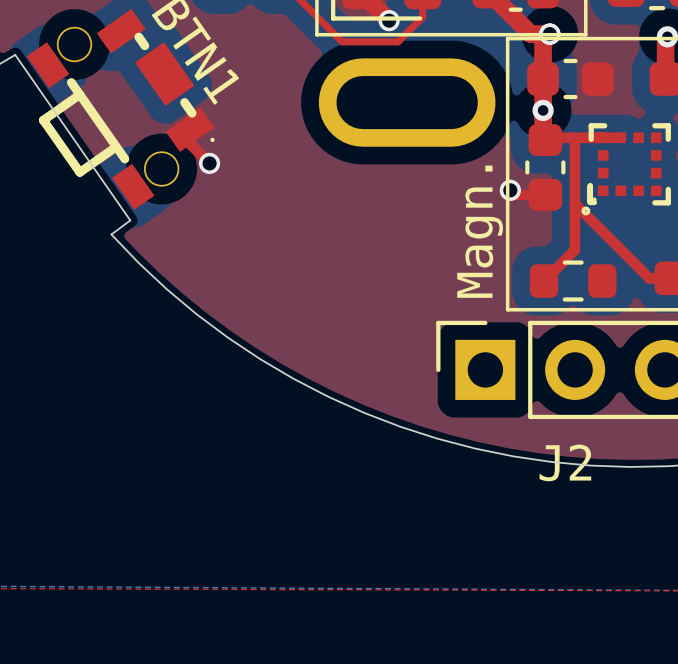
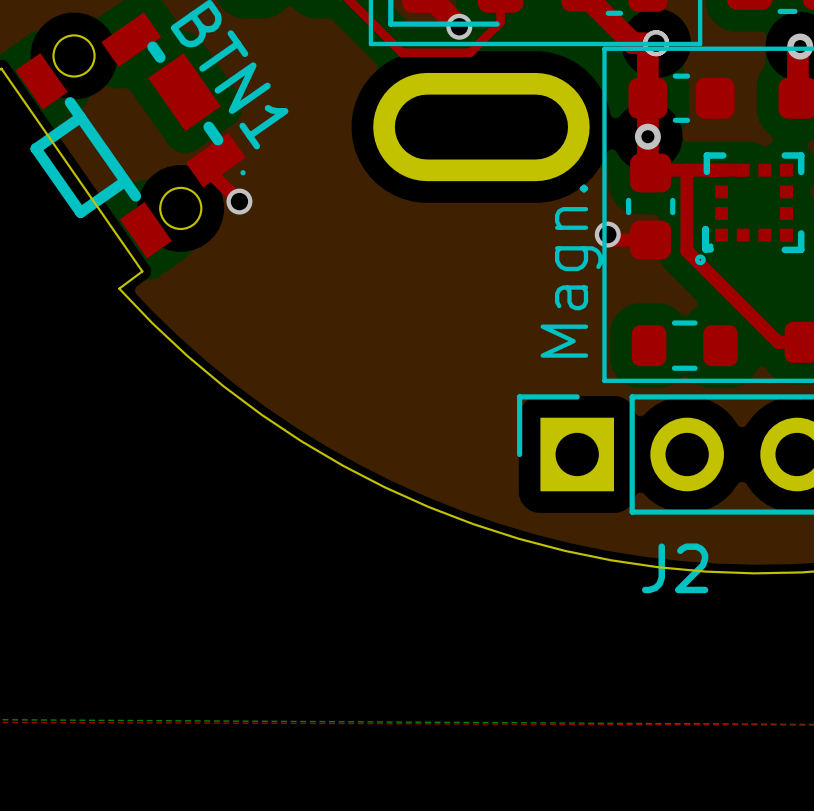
top track: (574, 203) (574, 250) (544, 281) -> none

